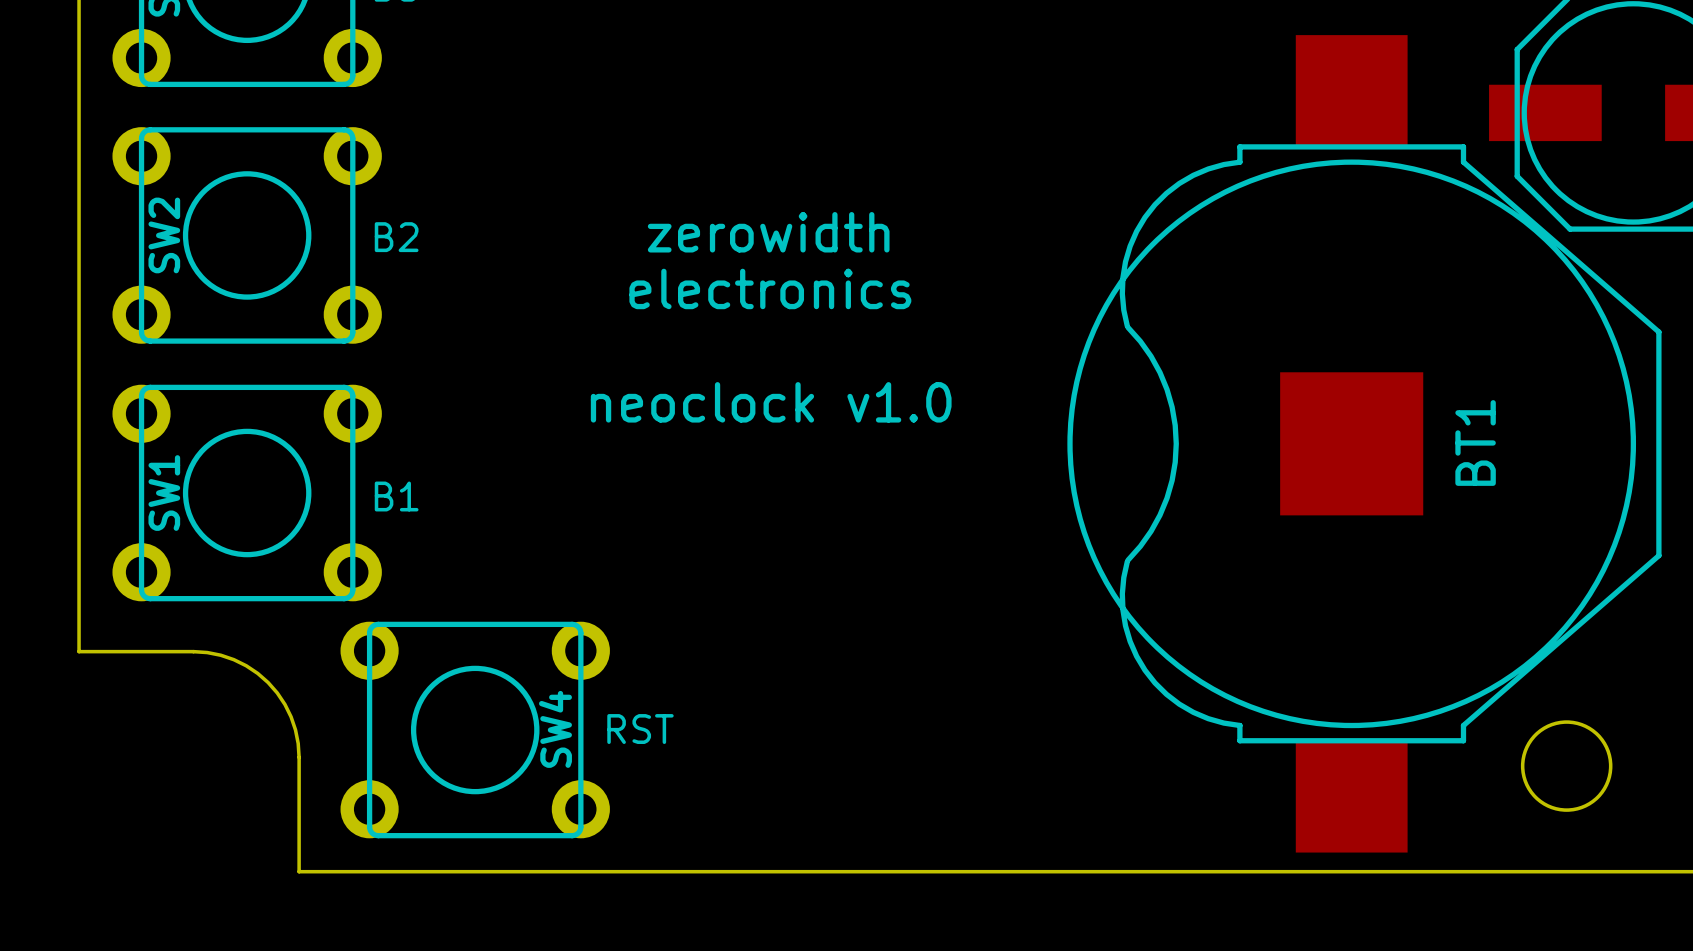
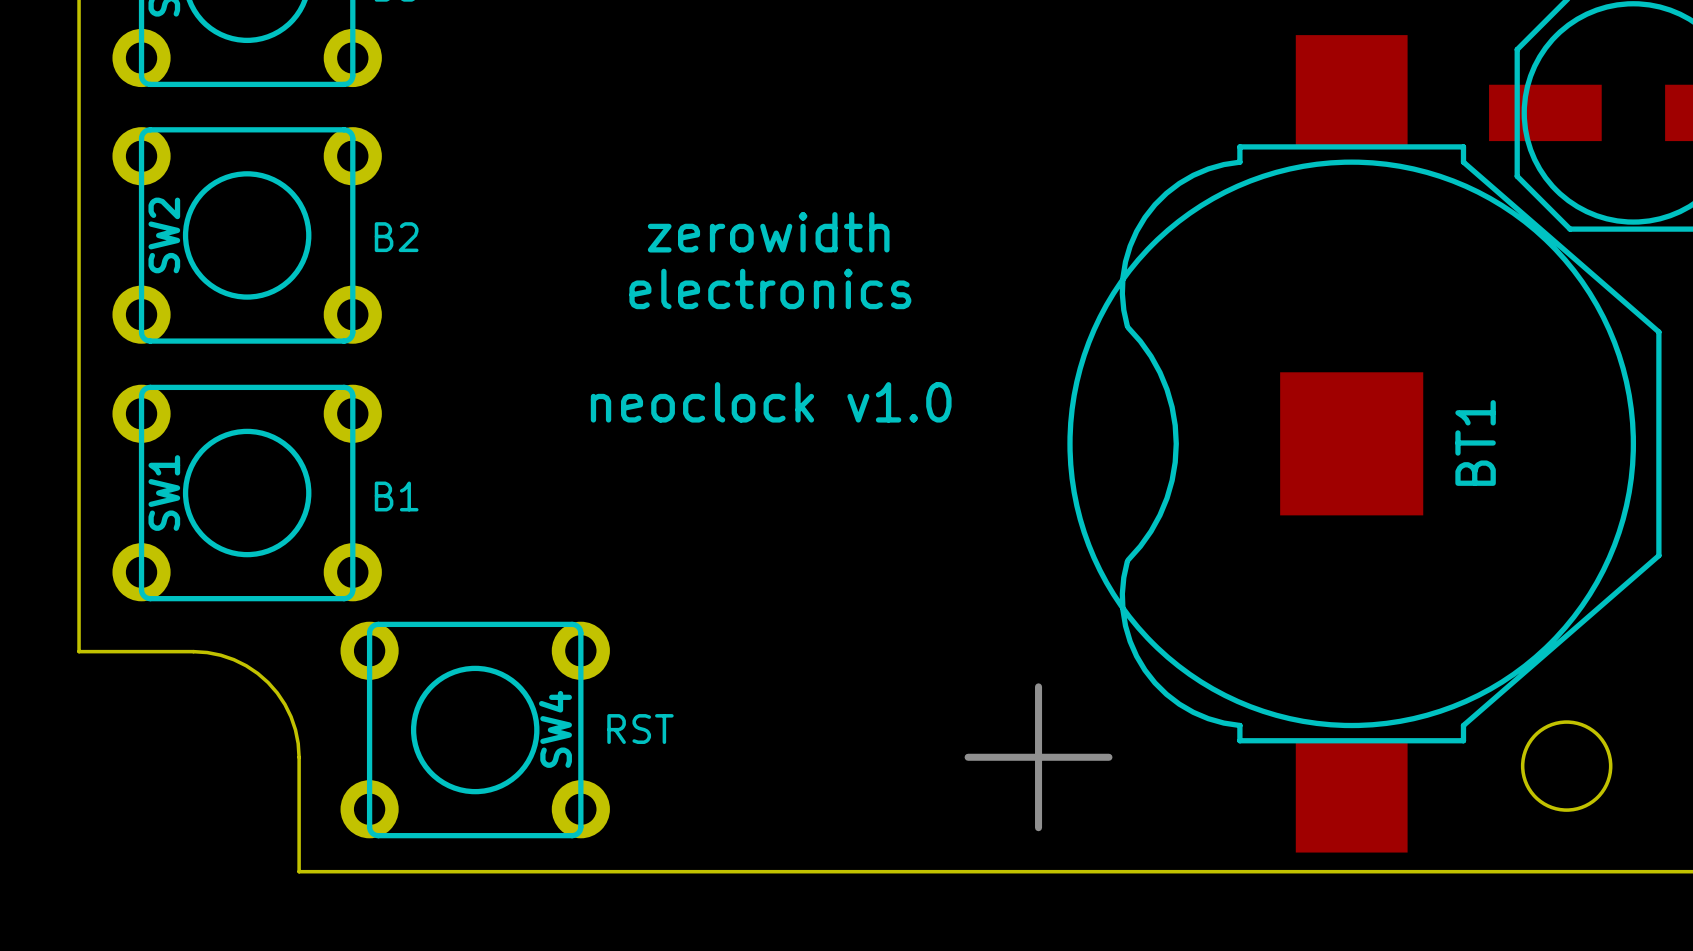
line: none -> (1038, 686) (1038, 827)
line: none -> (968, 757) (1108, 757)

